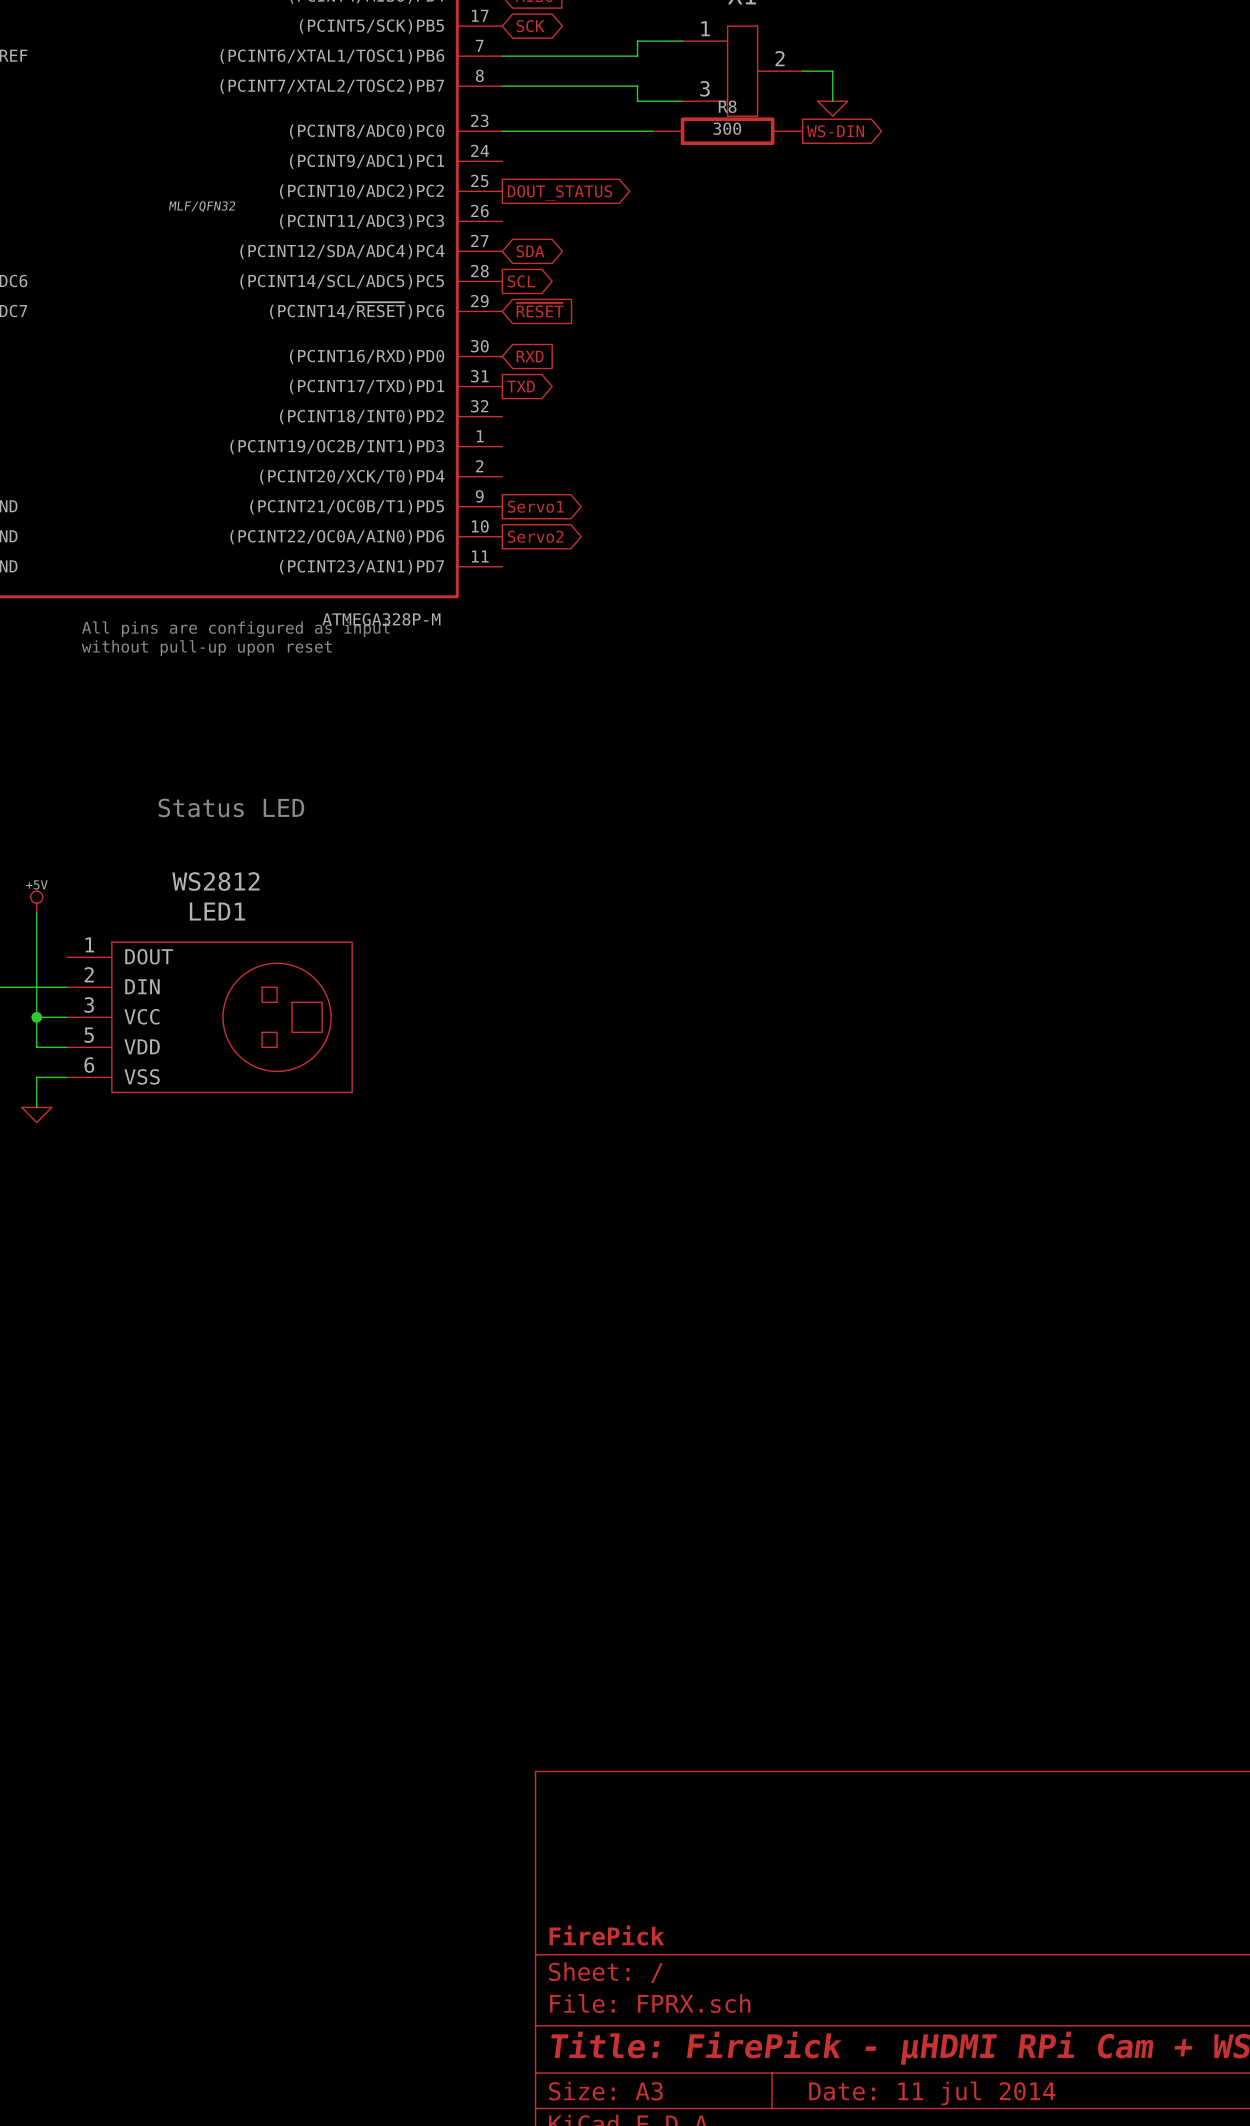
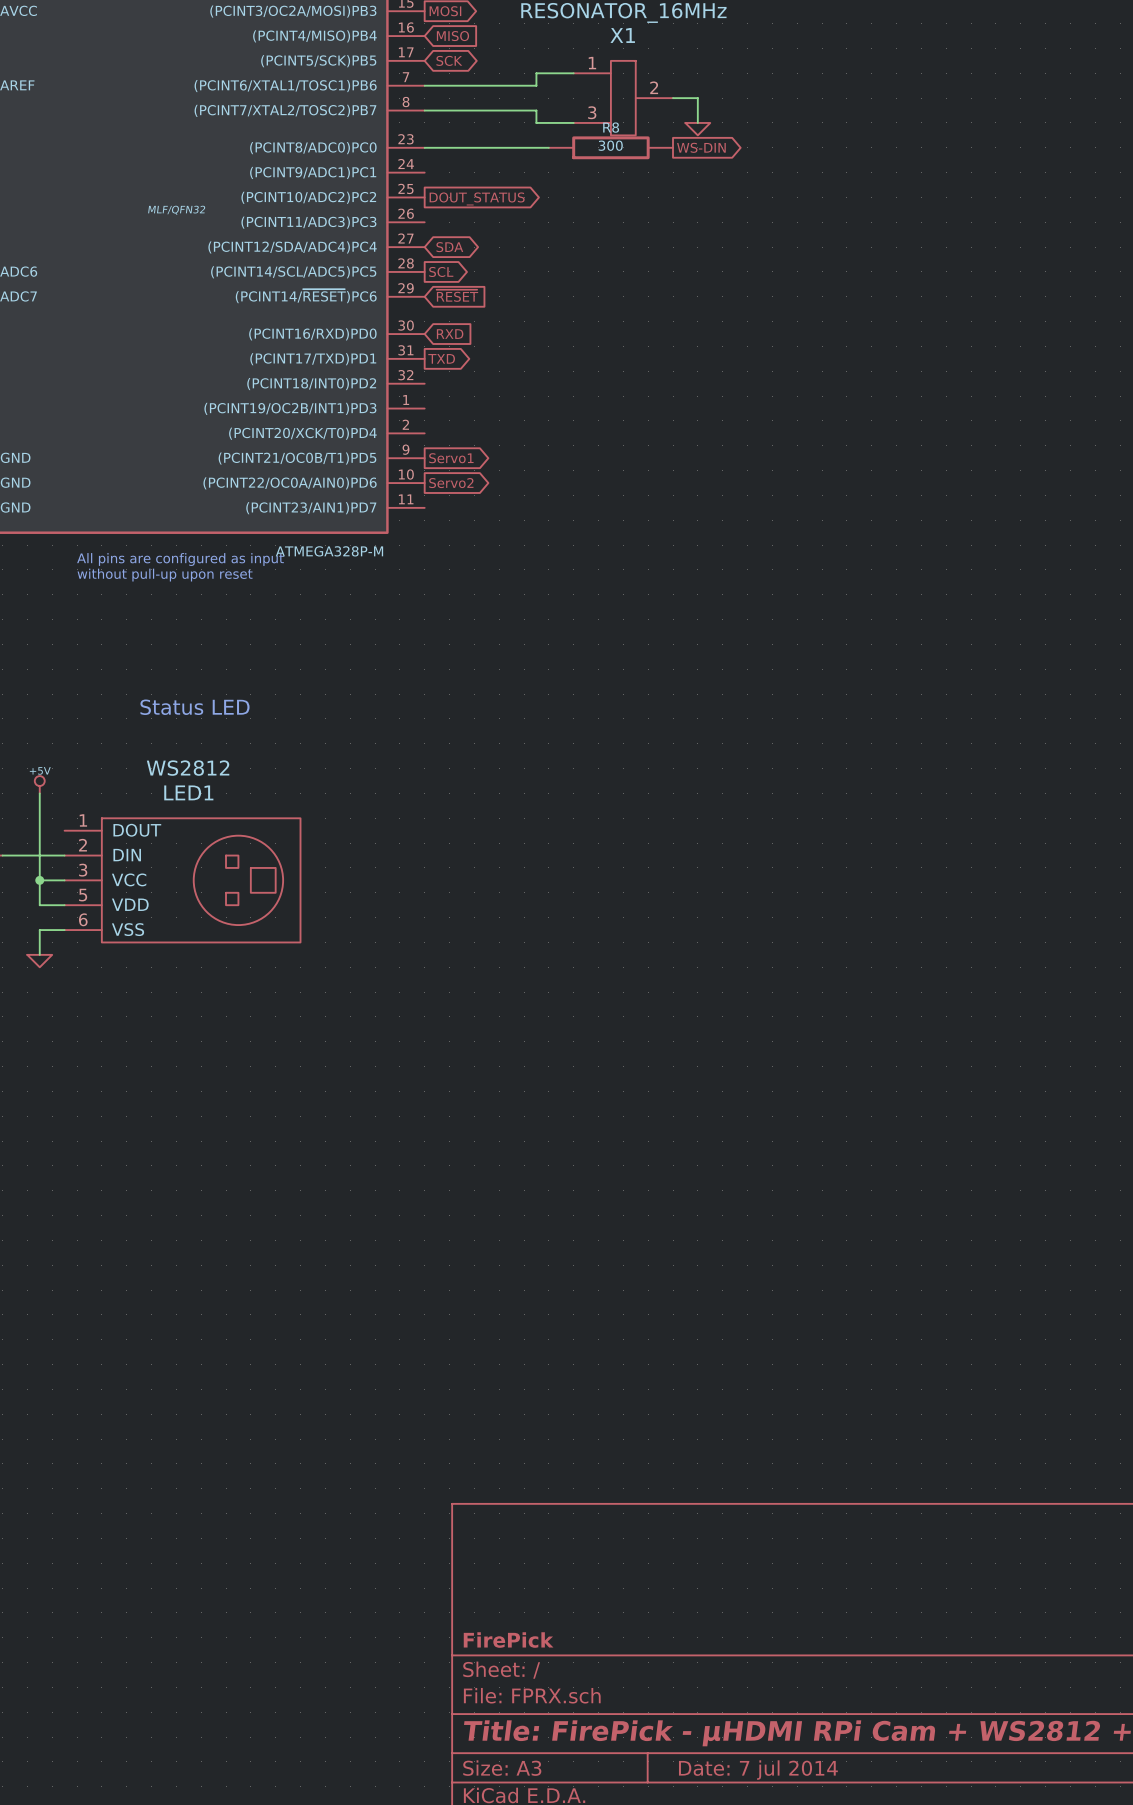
title block: Date: 11 jul 2014 (932, 2093) -> Date: 7 jul 2014 (758, 1770)

